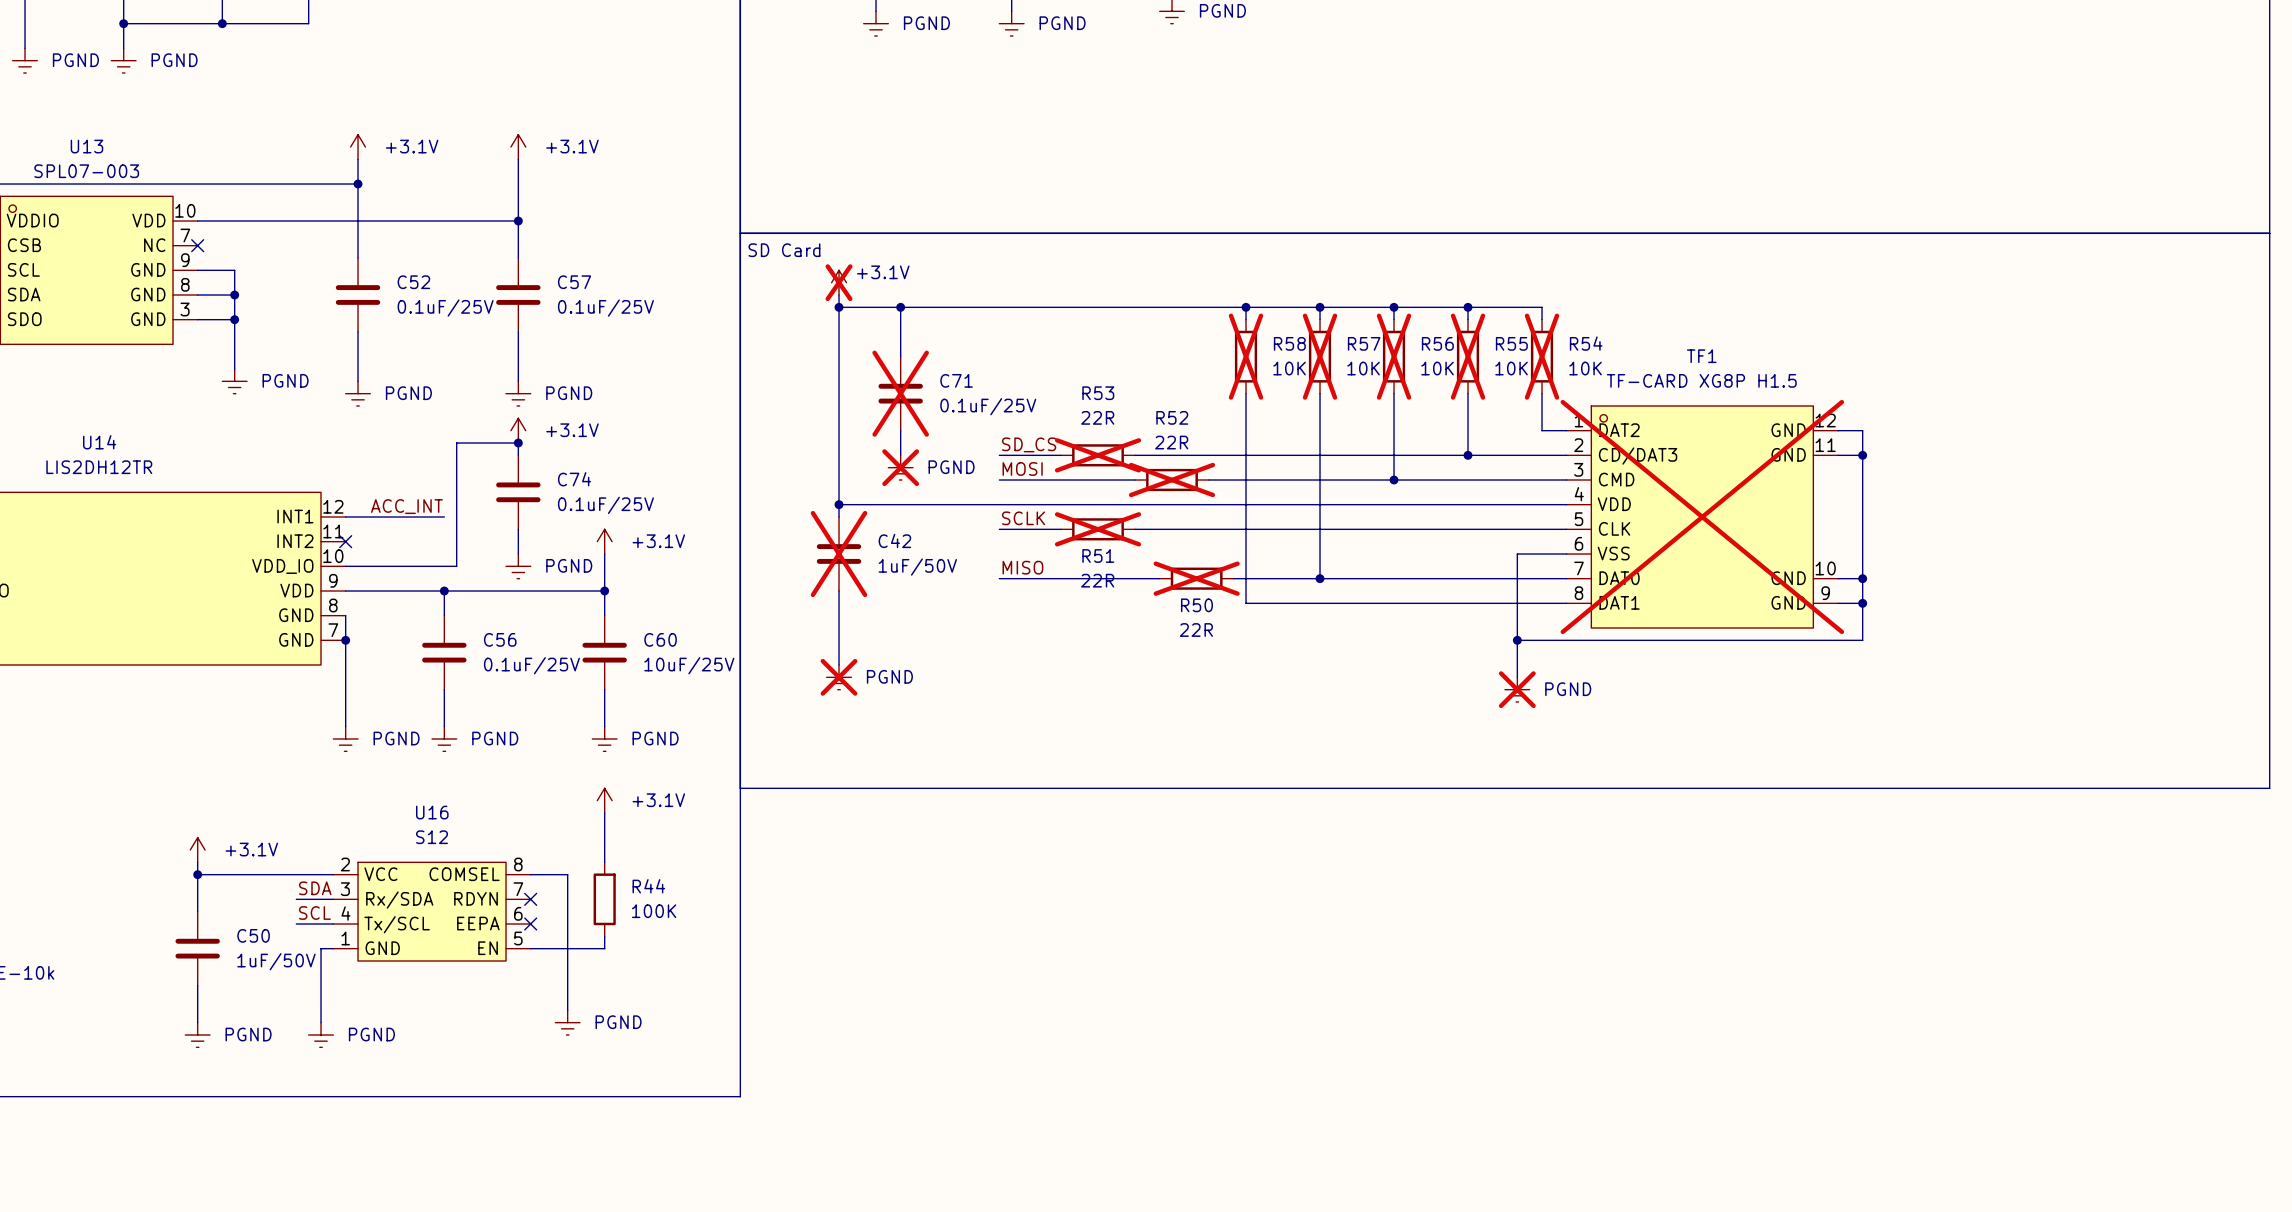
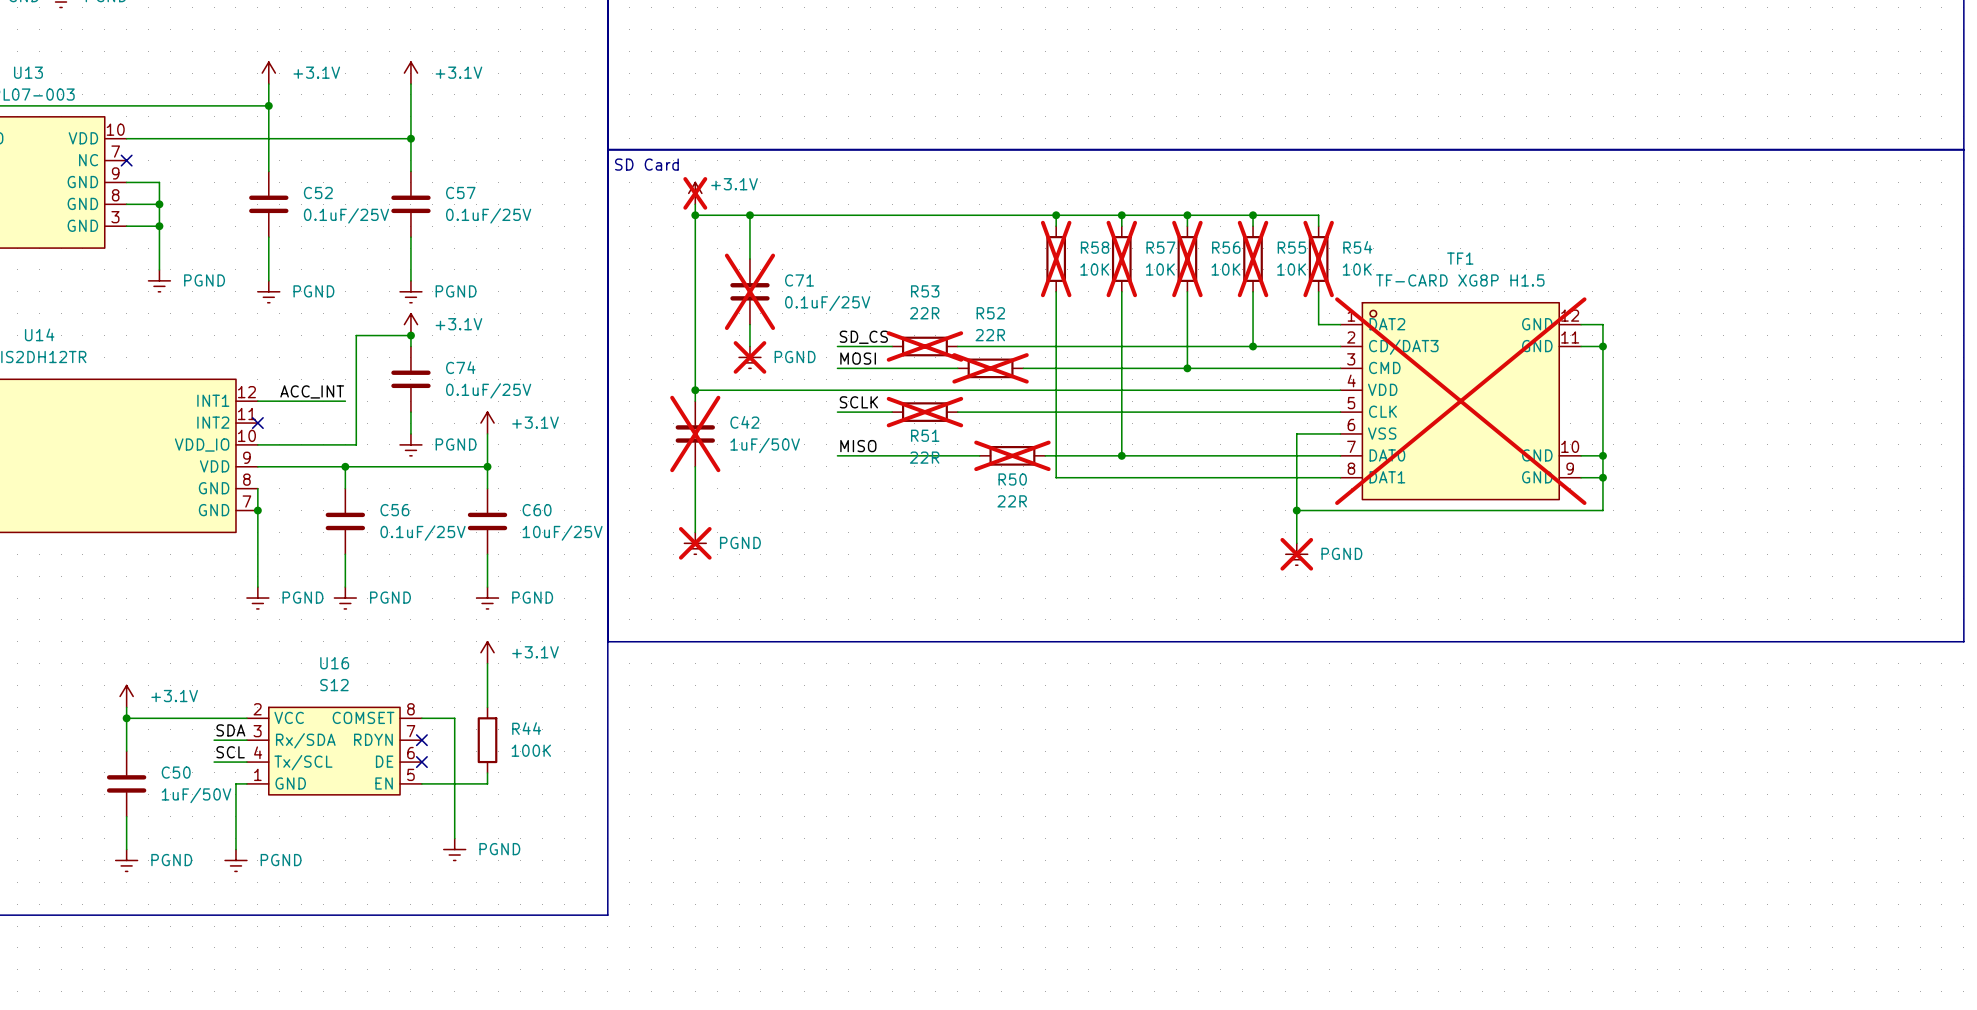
U16 pin name: COMSEL (464, 874) -> COMSET (363, 717)
U16 pin name: EEPA (478, 923) -> DE (384, 761)

